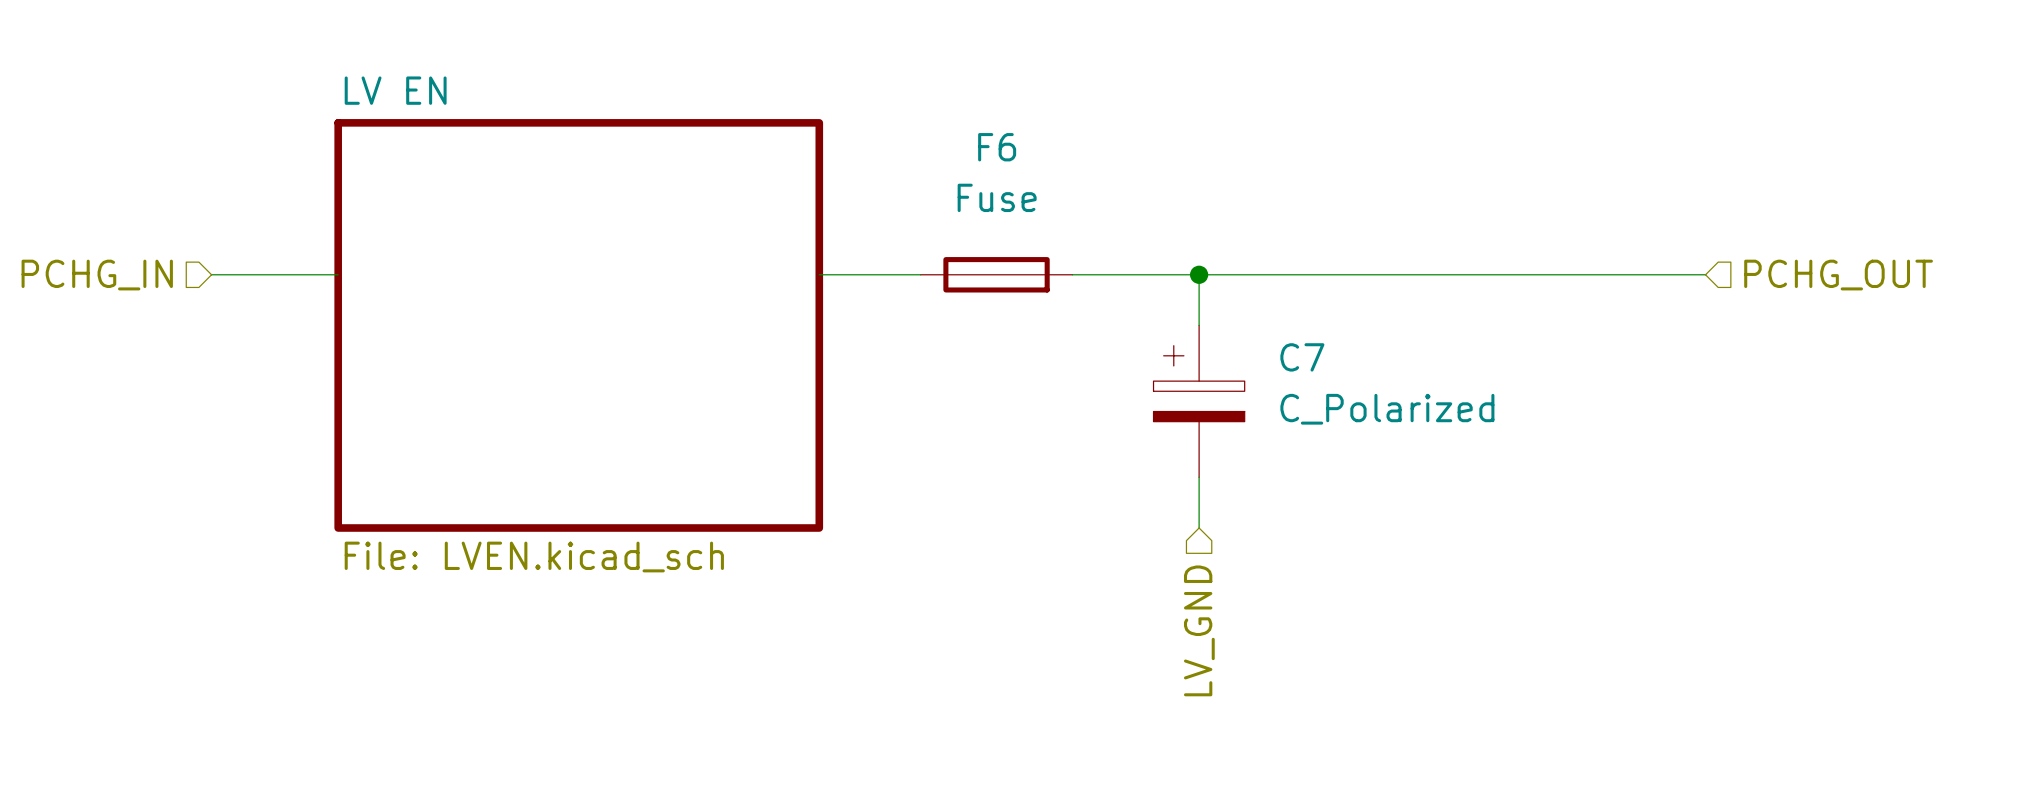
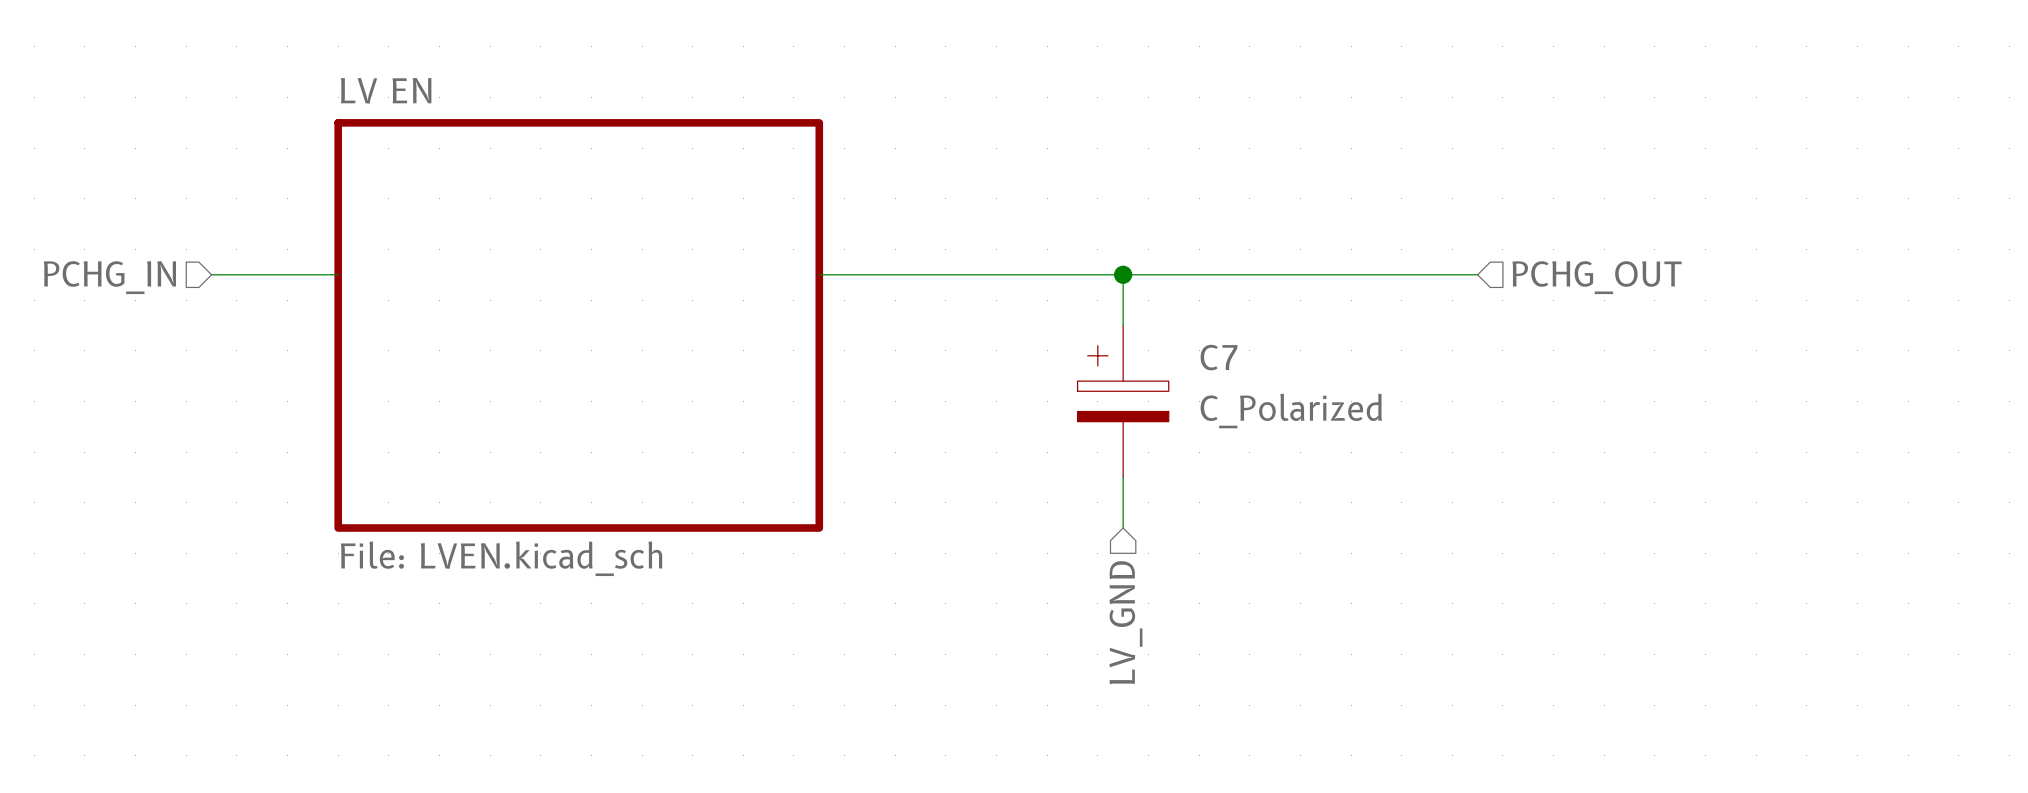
F6: Fuse (996, 274) -> none
wire: (1199, 274) (1199, 325) -> (1123, 274) (1123, 325)
junction position: (1199, 274) -> (1123, 274)
wire: (1477, 274) (1705, 274) -> none
hierarchical label position: PCHG_OUT (1838, 275) -> PCHG_OUT (1597, 277)
C7 position: (1199, 401) -> (1123, 401)
wire: (1199, 477) (1199, 528) -> (1123, 477) (1123, 528)
hierarchical label position: LV_GND (1199, 630) -> LV_GND (1125, 622)

